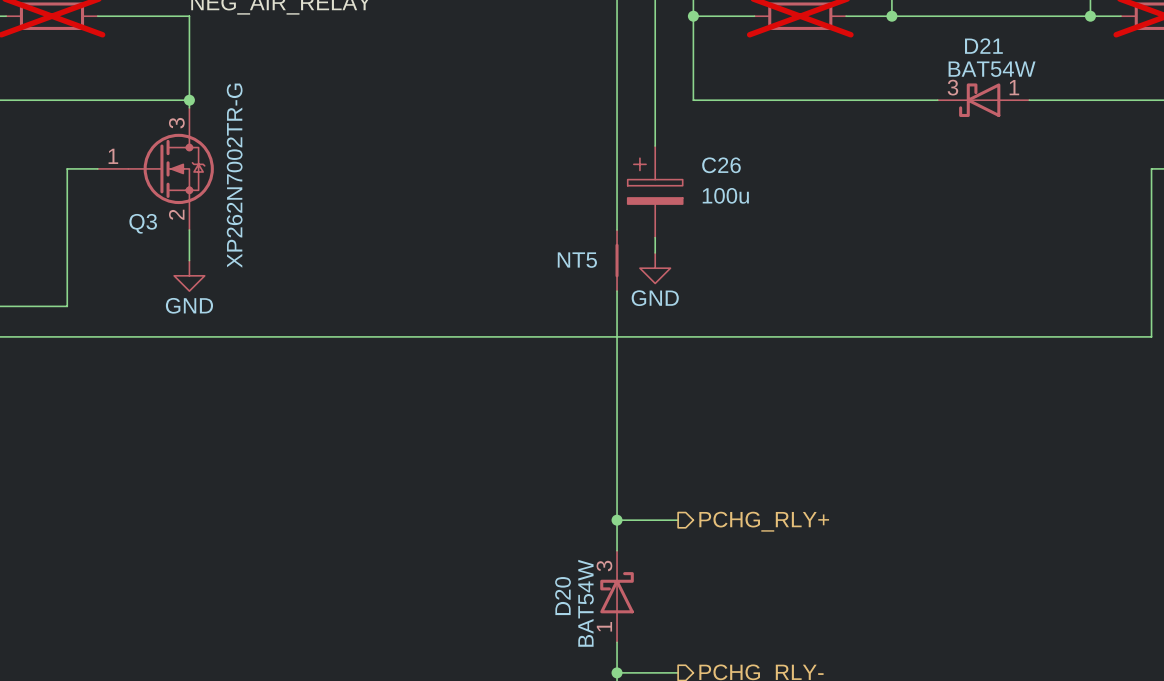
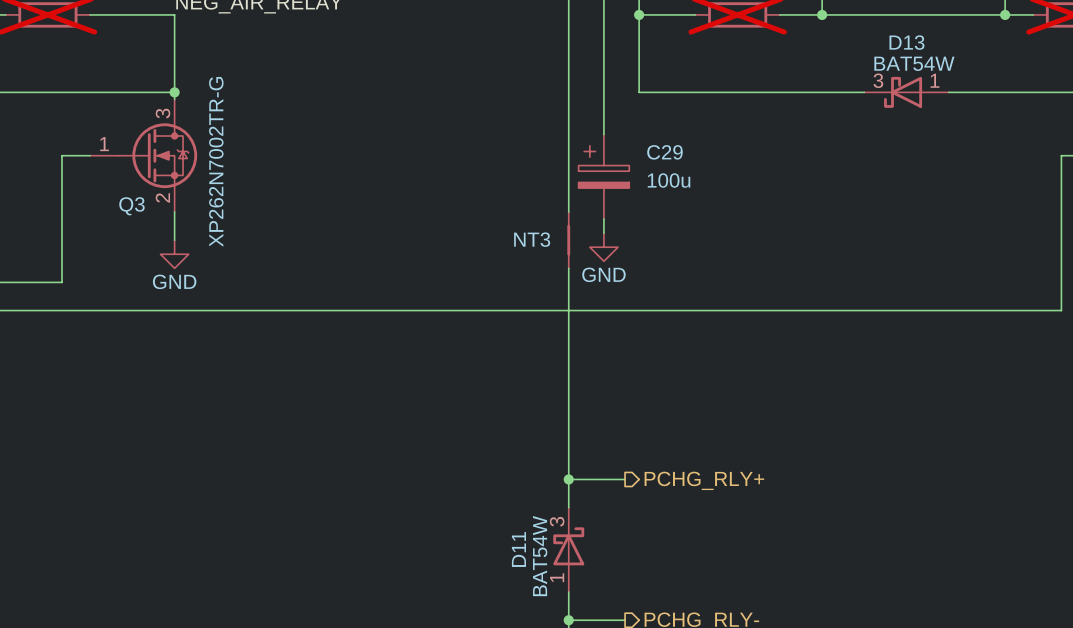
D21 name: D21 (983, 46) -> D13 (906, 42)
C26 name: C26 (721, 165) -> C29 (664, 152)
NT5 name: NT5 (577, 260) -> NT3 (532, 239)
D20 name: D20 (563, 596) -> D11 (518, 549)

